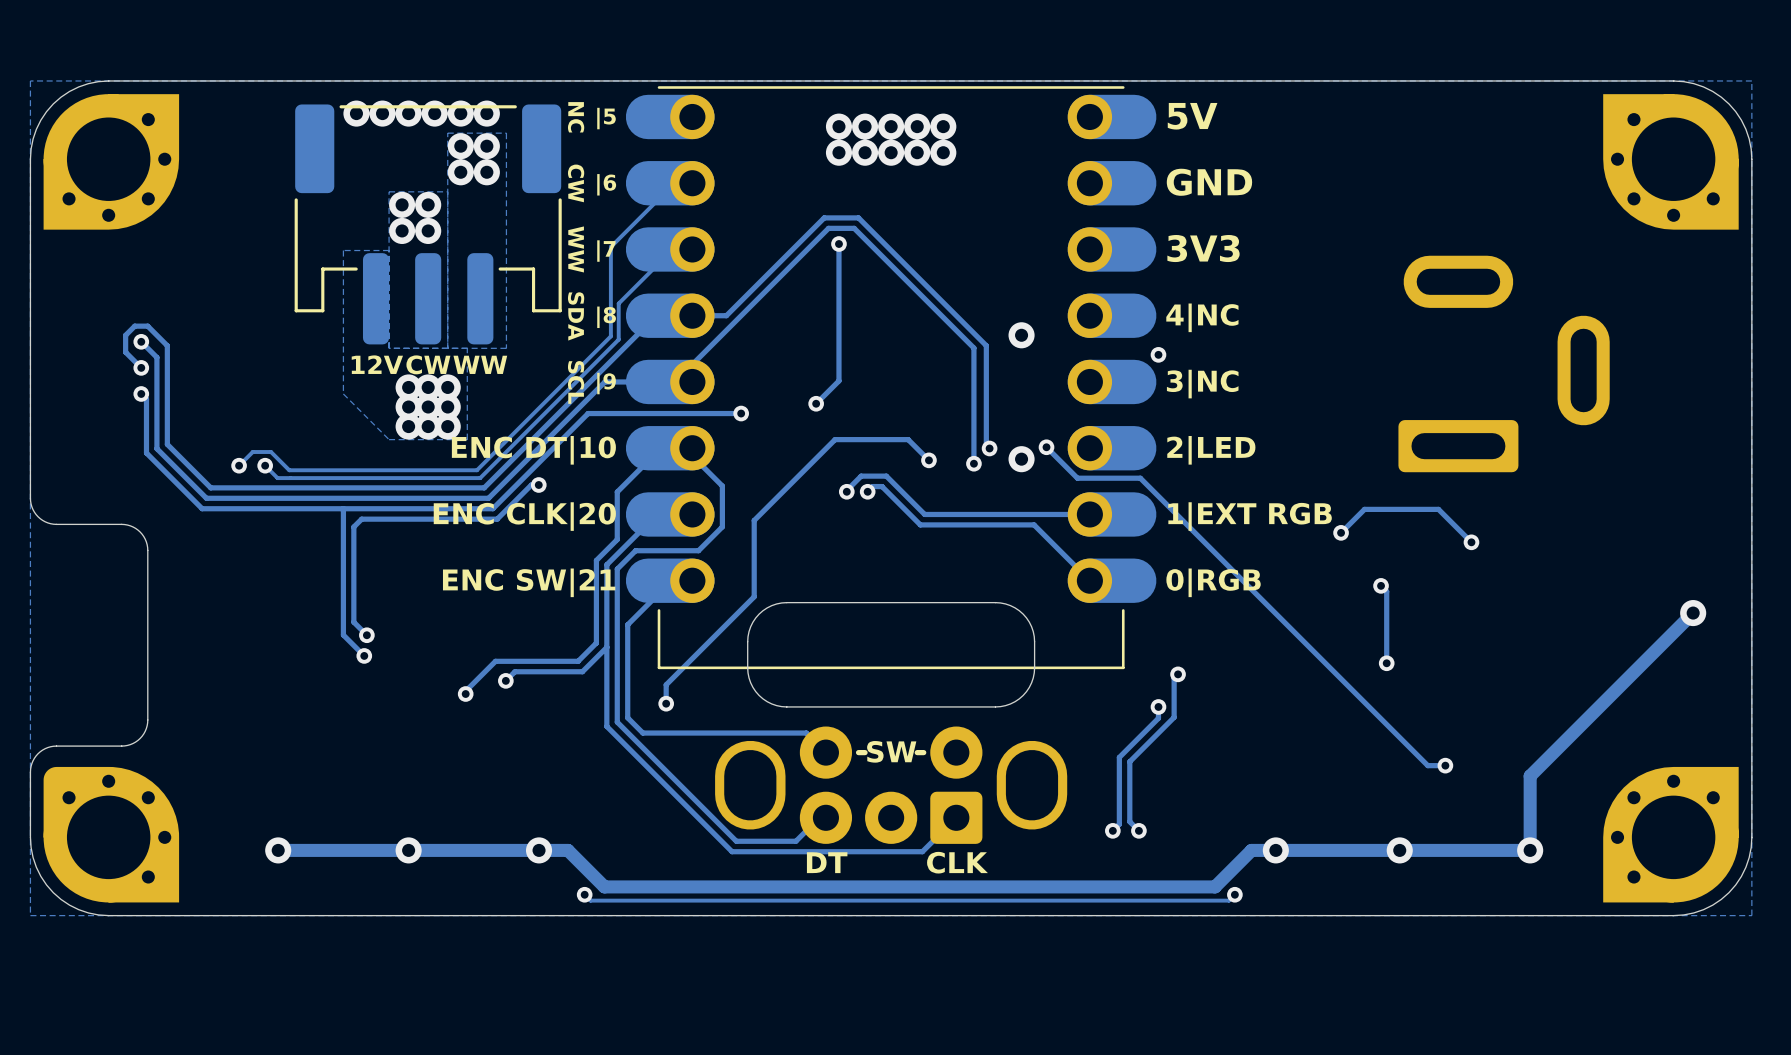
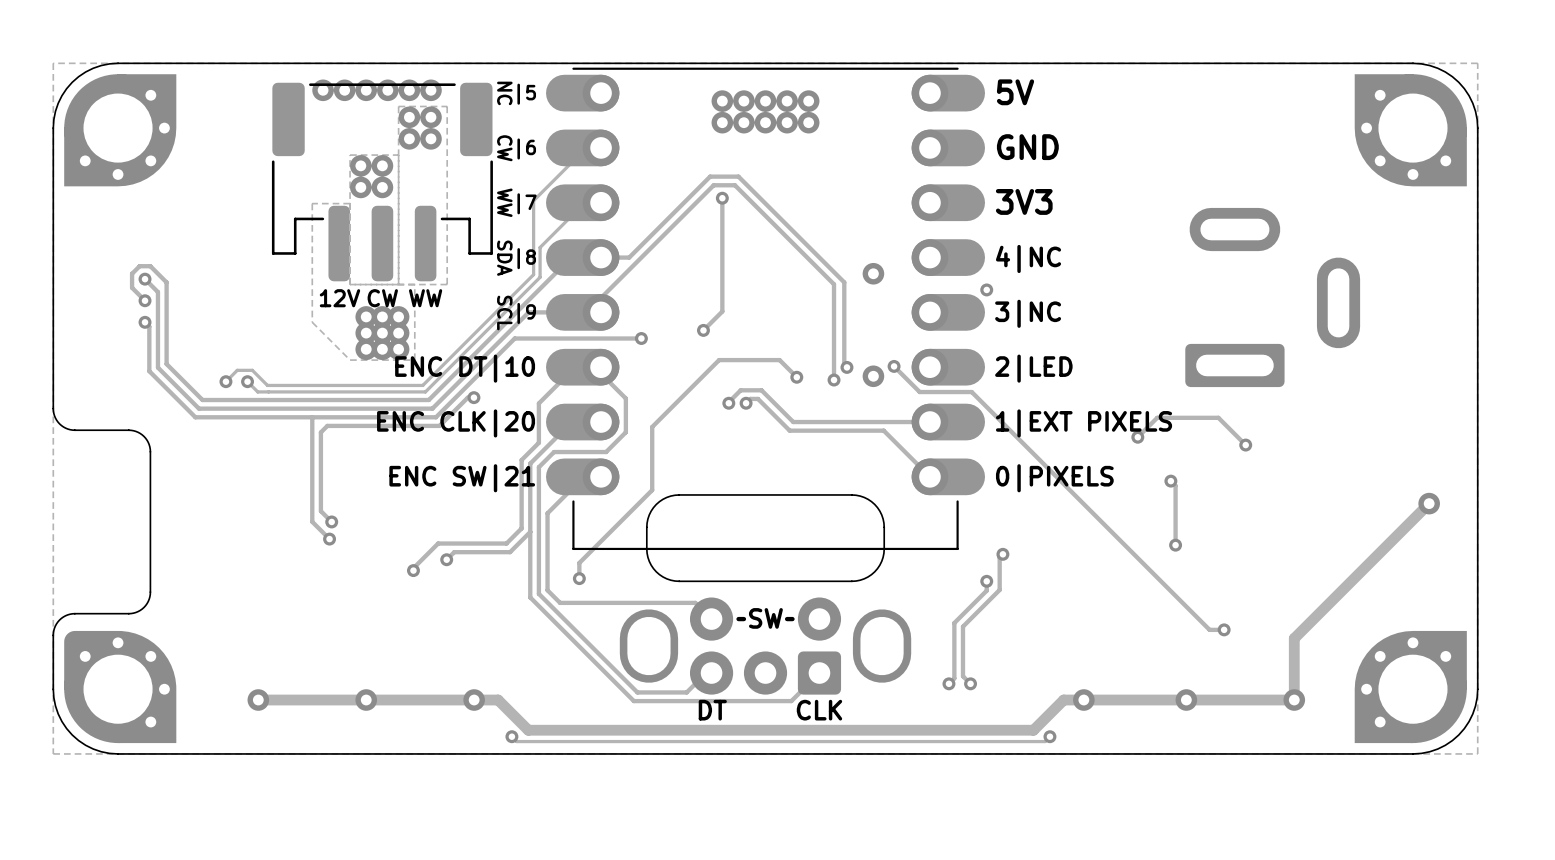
text: 1|EXT RGB (1250, 516) -> 1|EXT PIXELS (1084, 423)
text: 0|RGB (1213, 582) -> 0|PIXELS (1054, 478)

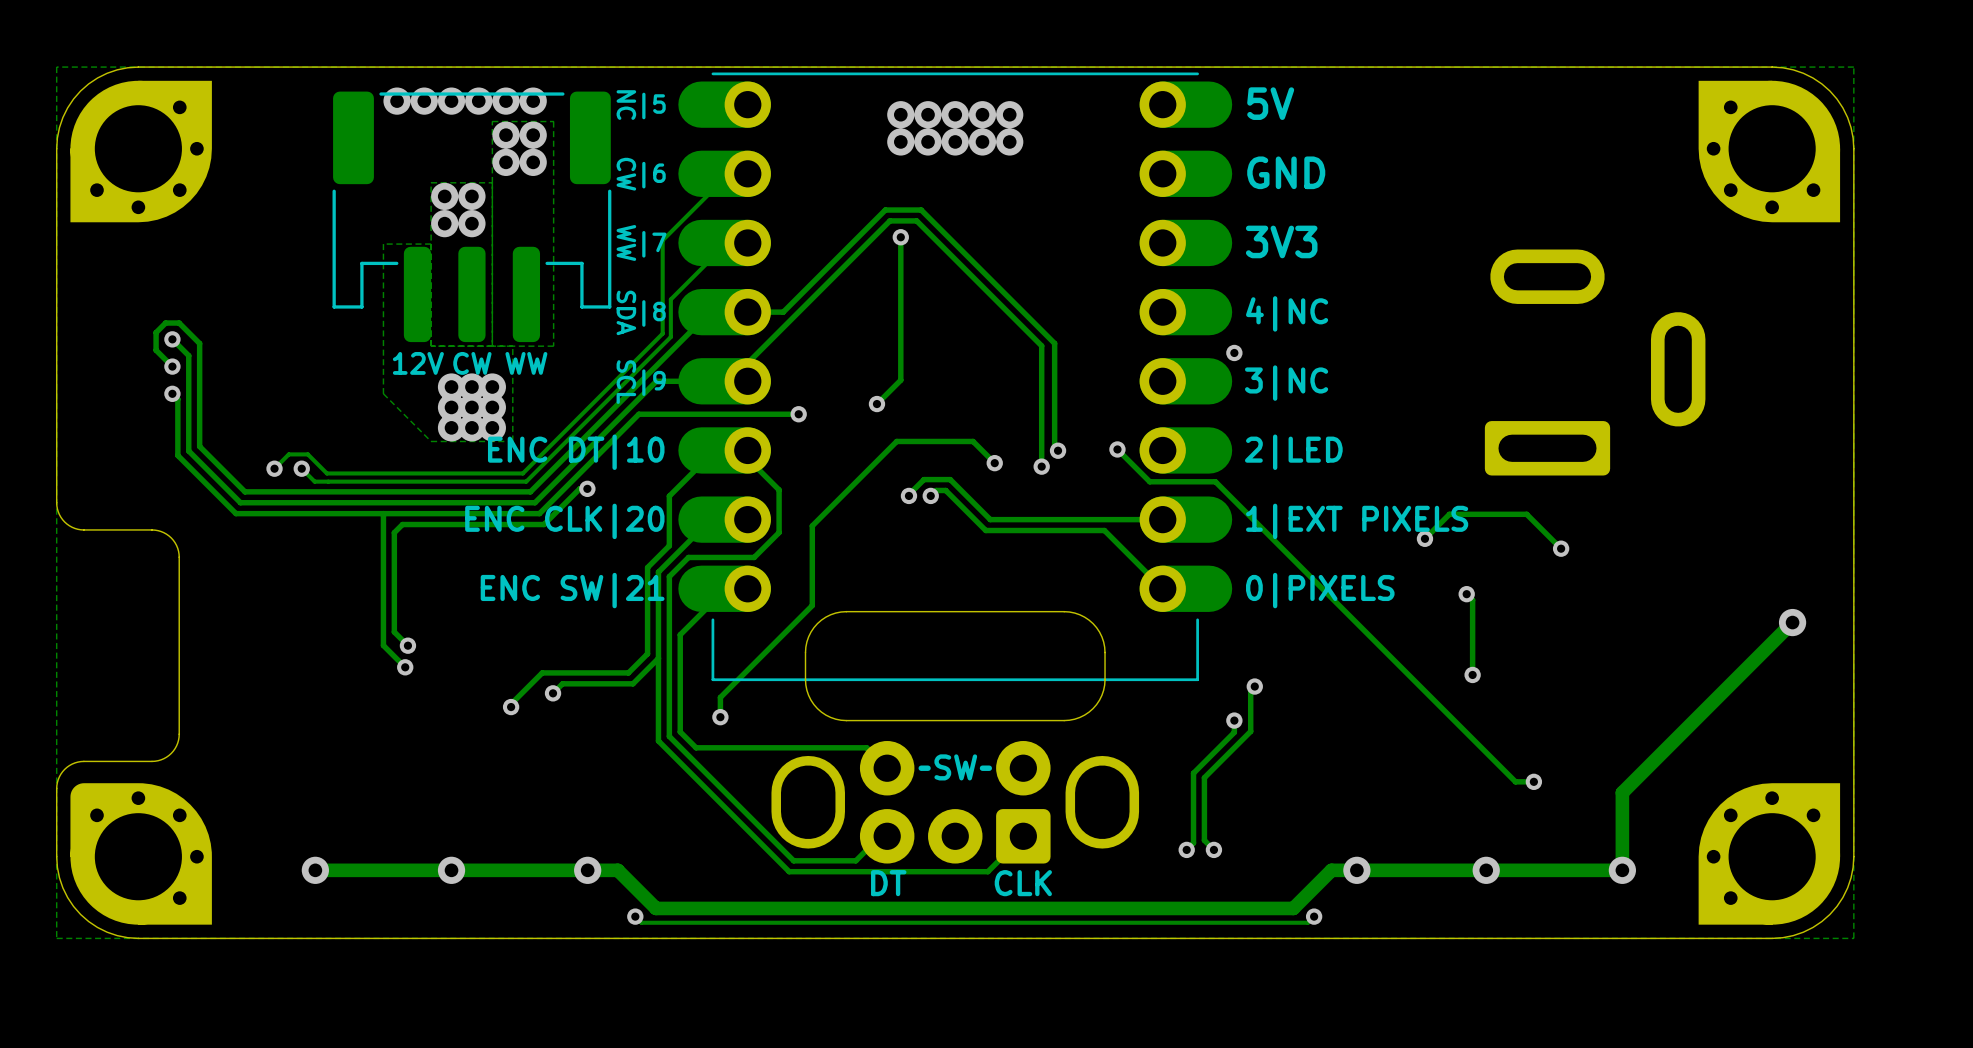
via: (873, 273) -> none
via: (873, 376) -> none

